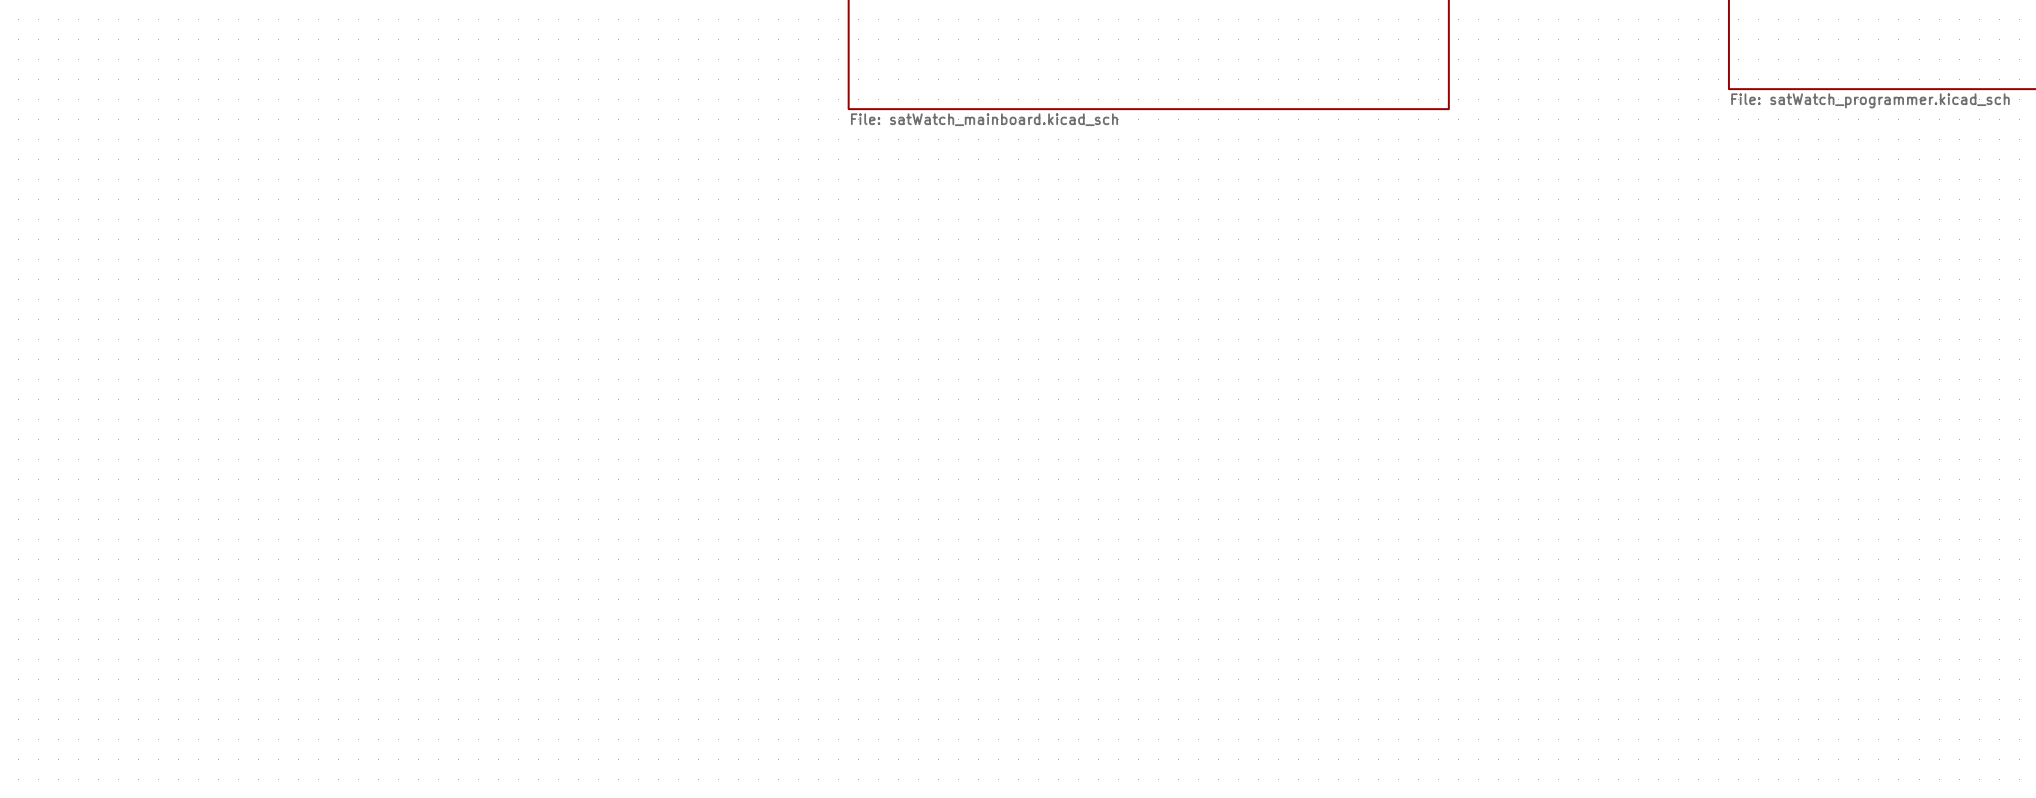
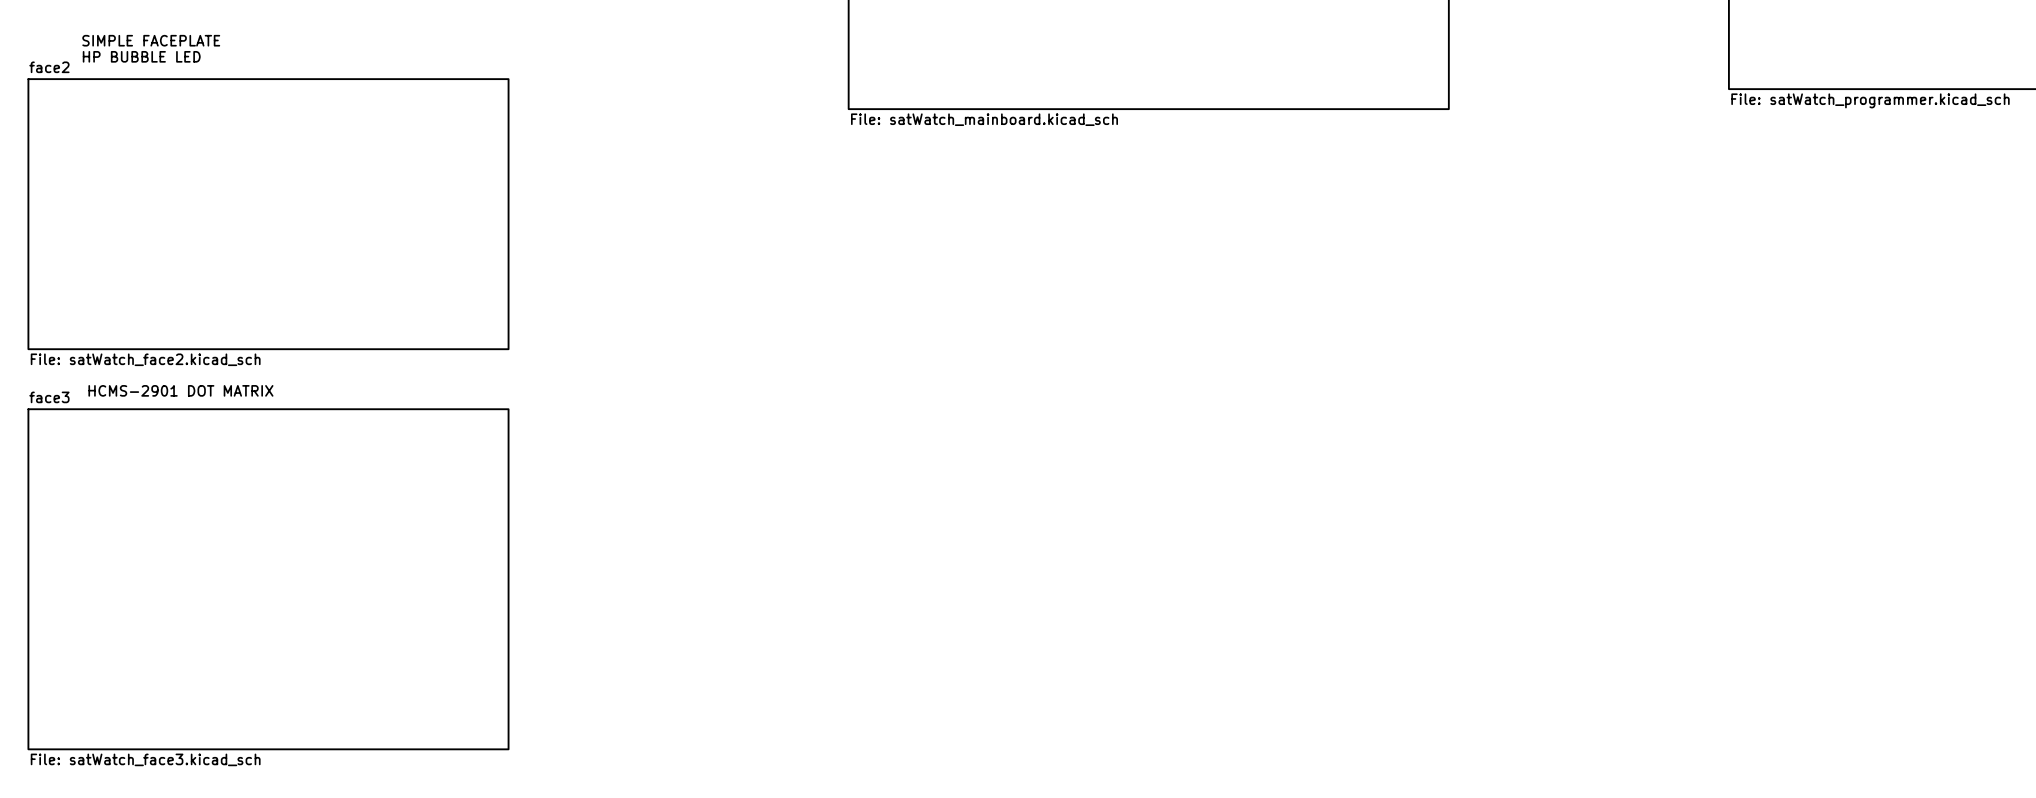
text: none -> SIMPLE FACEPLATE (151, 40)
text: none -> HP BUBBLE LED (141, 56)
sheet face2: none -> File: satWatch_face2.kicad_sch (268, 214)
text: none -> HCMS-2901 DOT MATRIX (180, 390)
sheet face3: none -> File: satWatch_face3.kicad_sch (268, 579)

